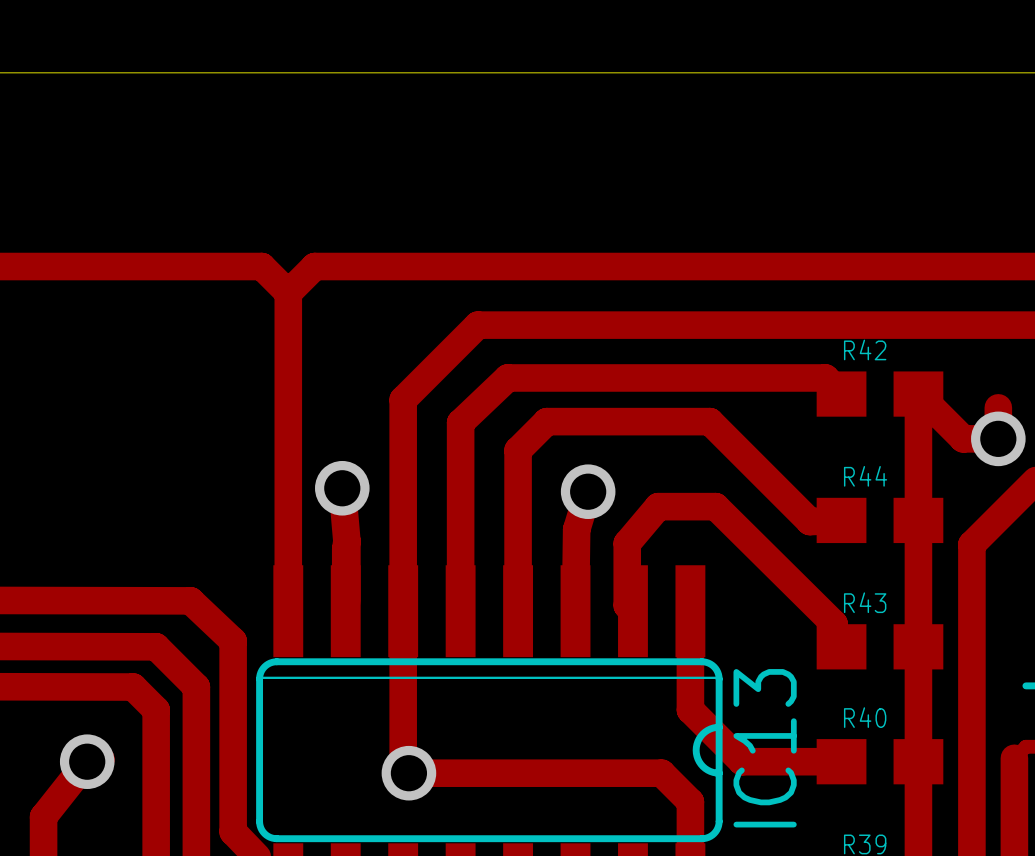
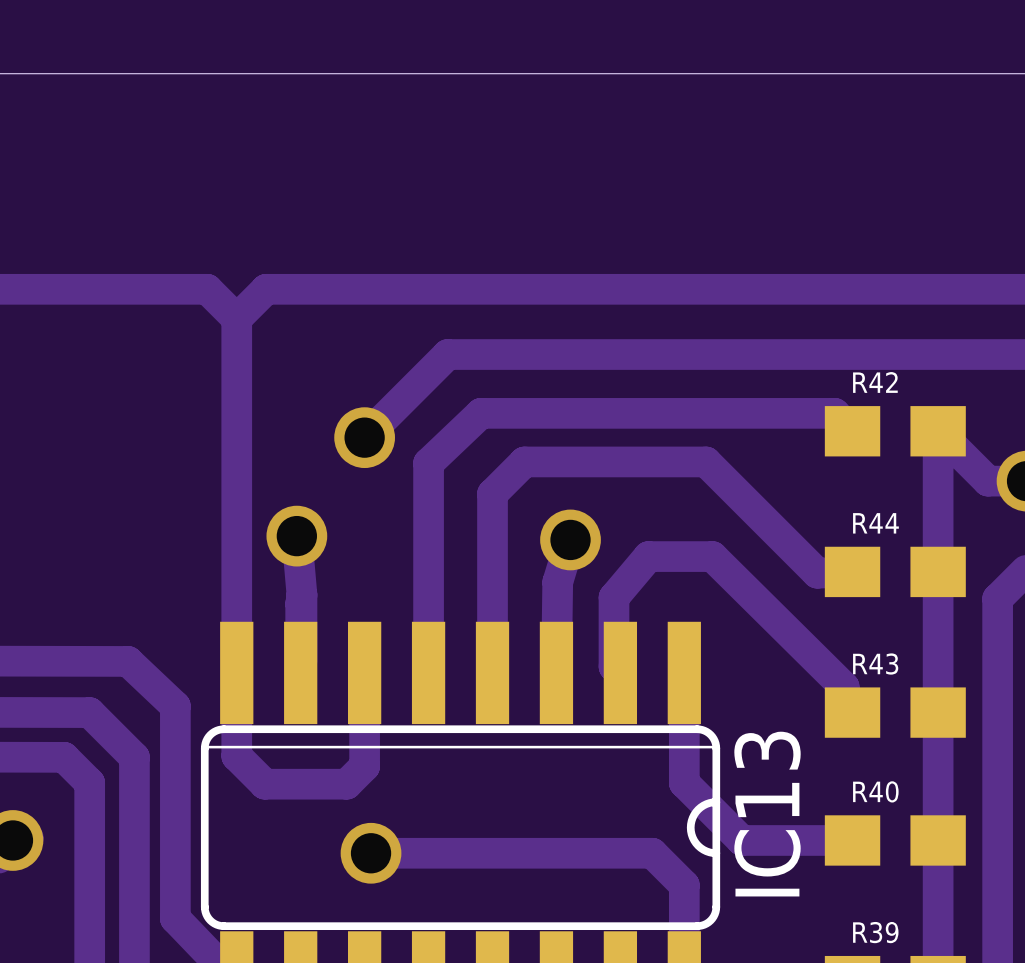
track: (403, 399) (403, 611) -> none
via: none -> (364, 437)
track: (403, 695) (403, 767) -> (364, 766) (346, 784) (264, 784) (236, 756) (236, 672)

